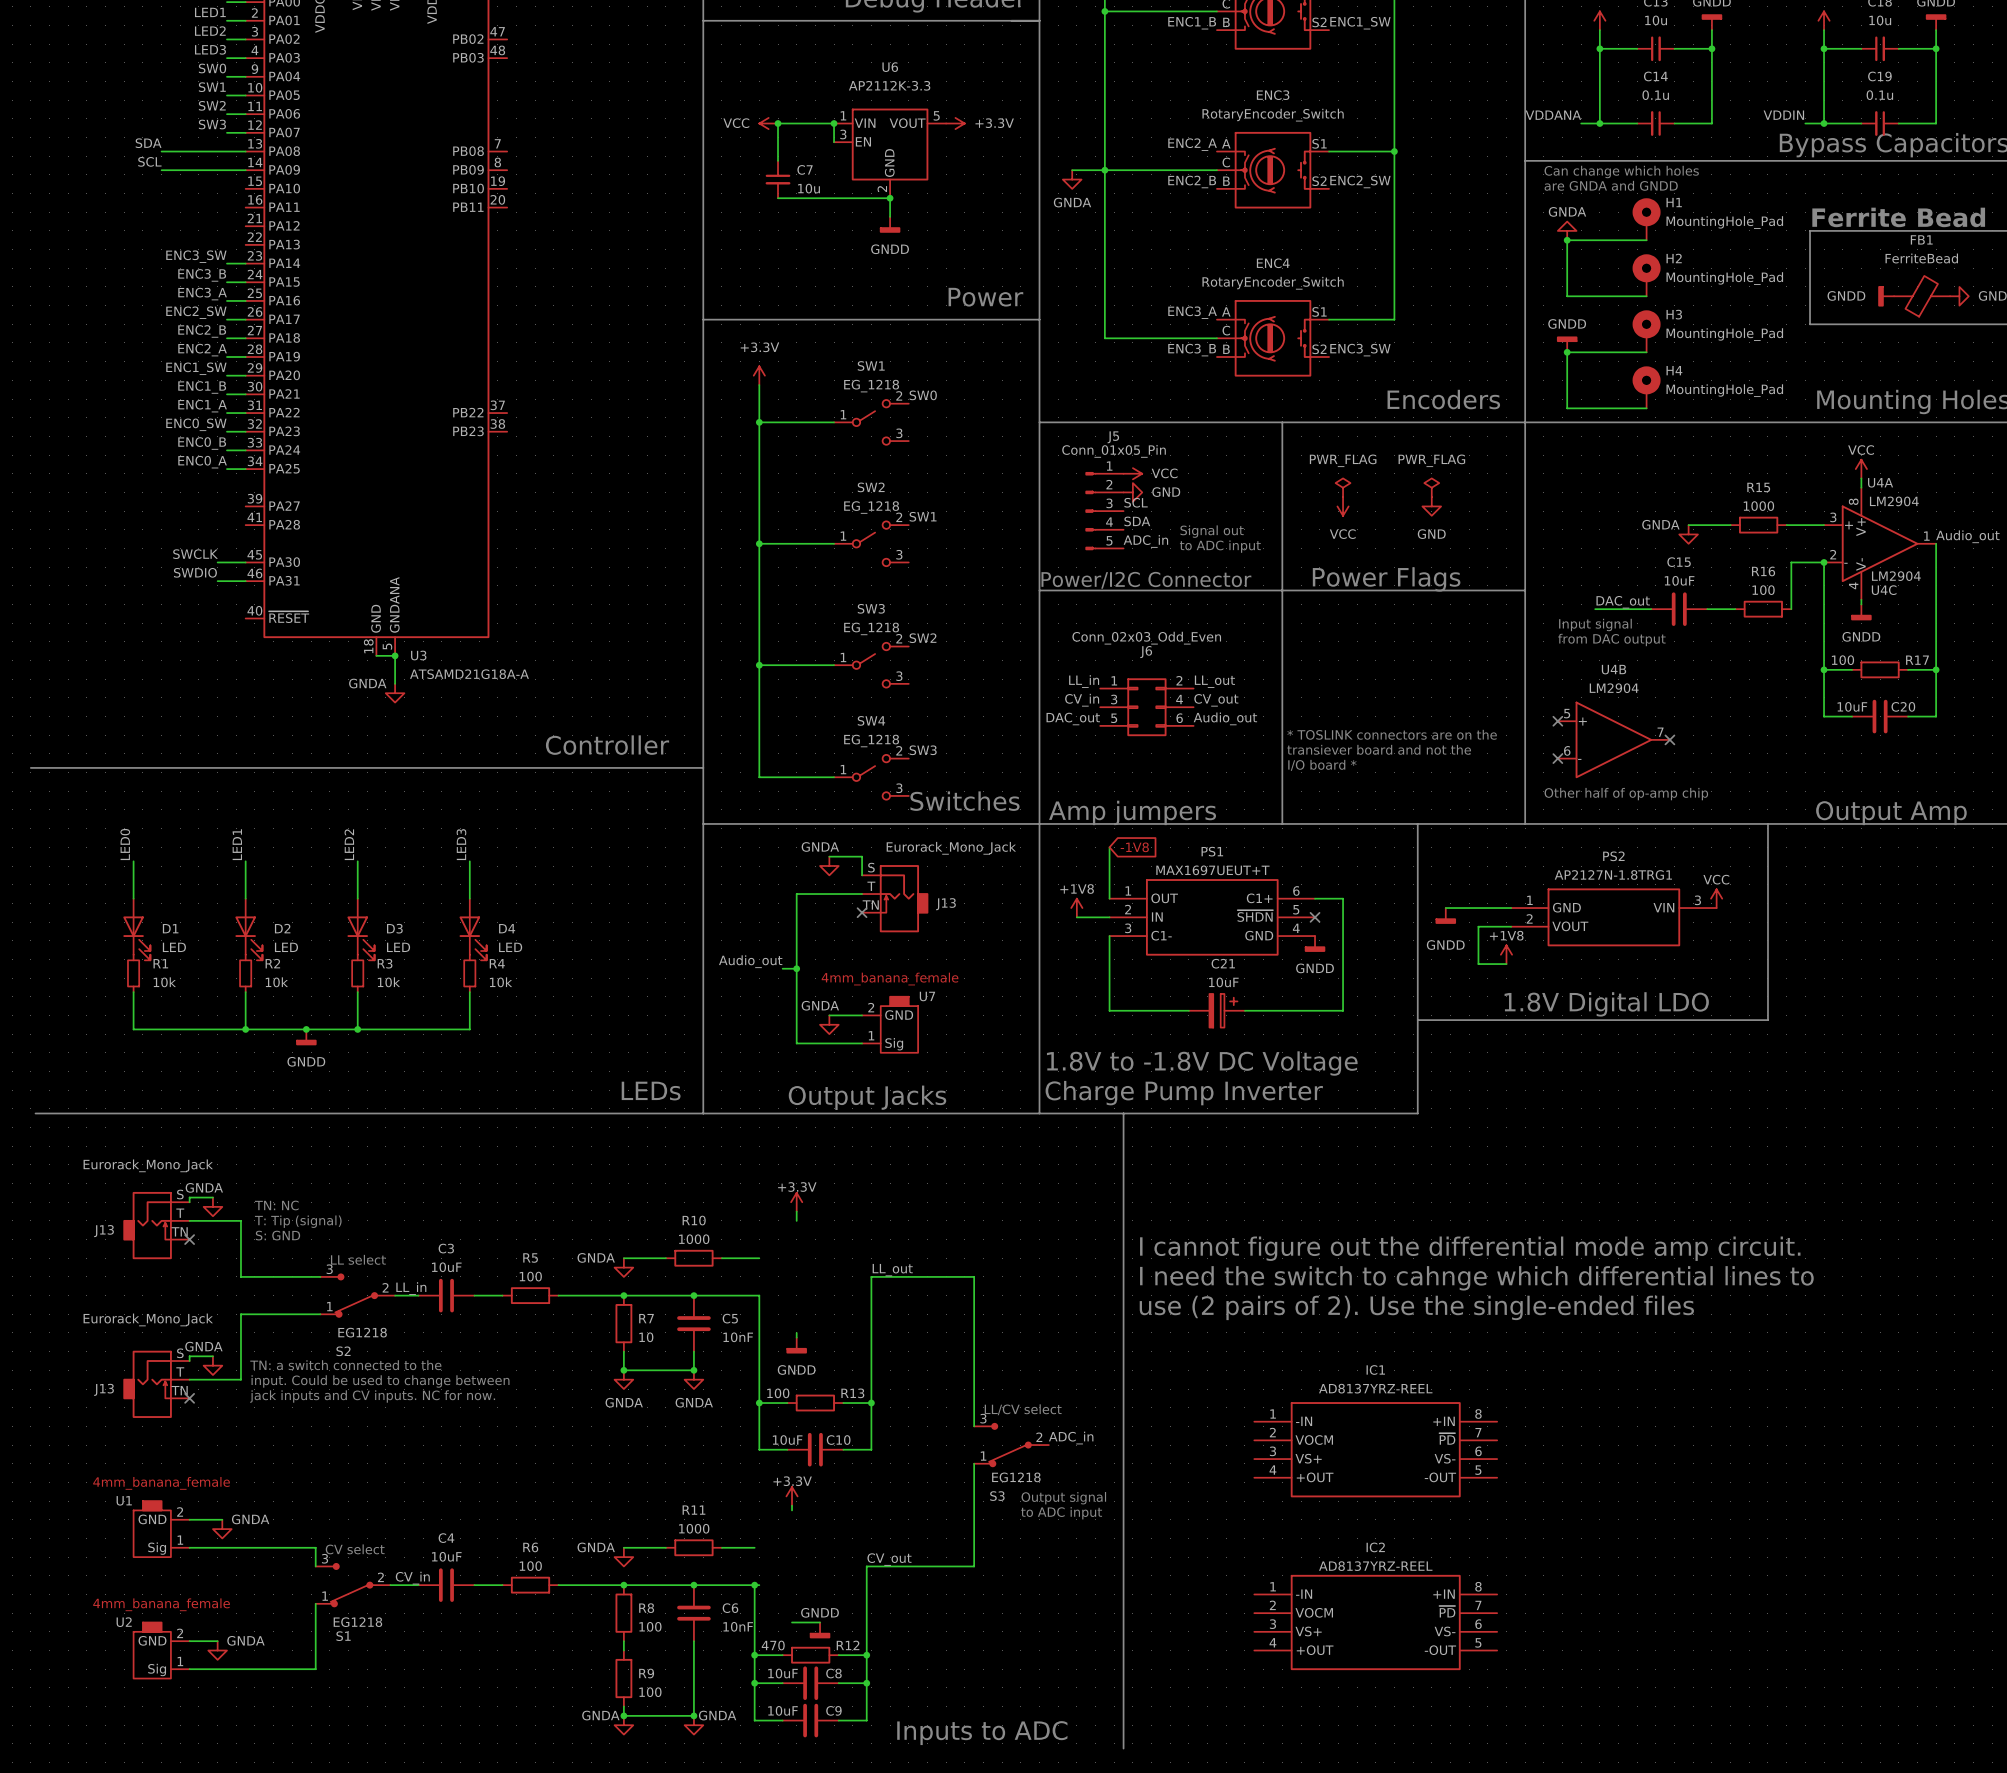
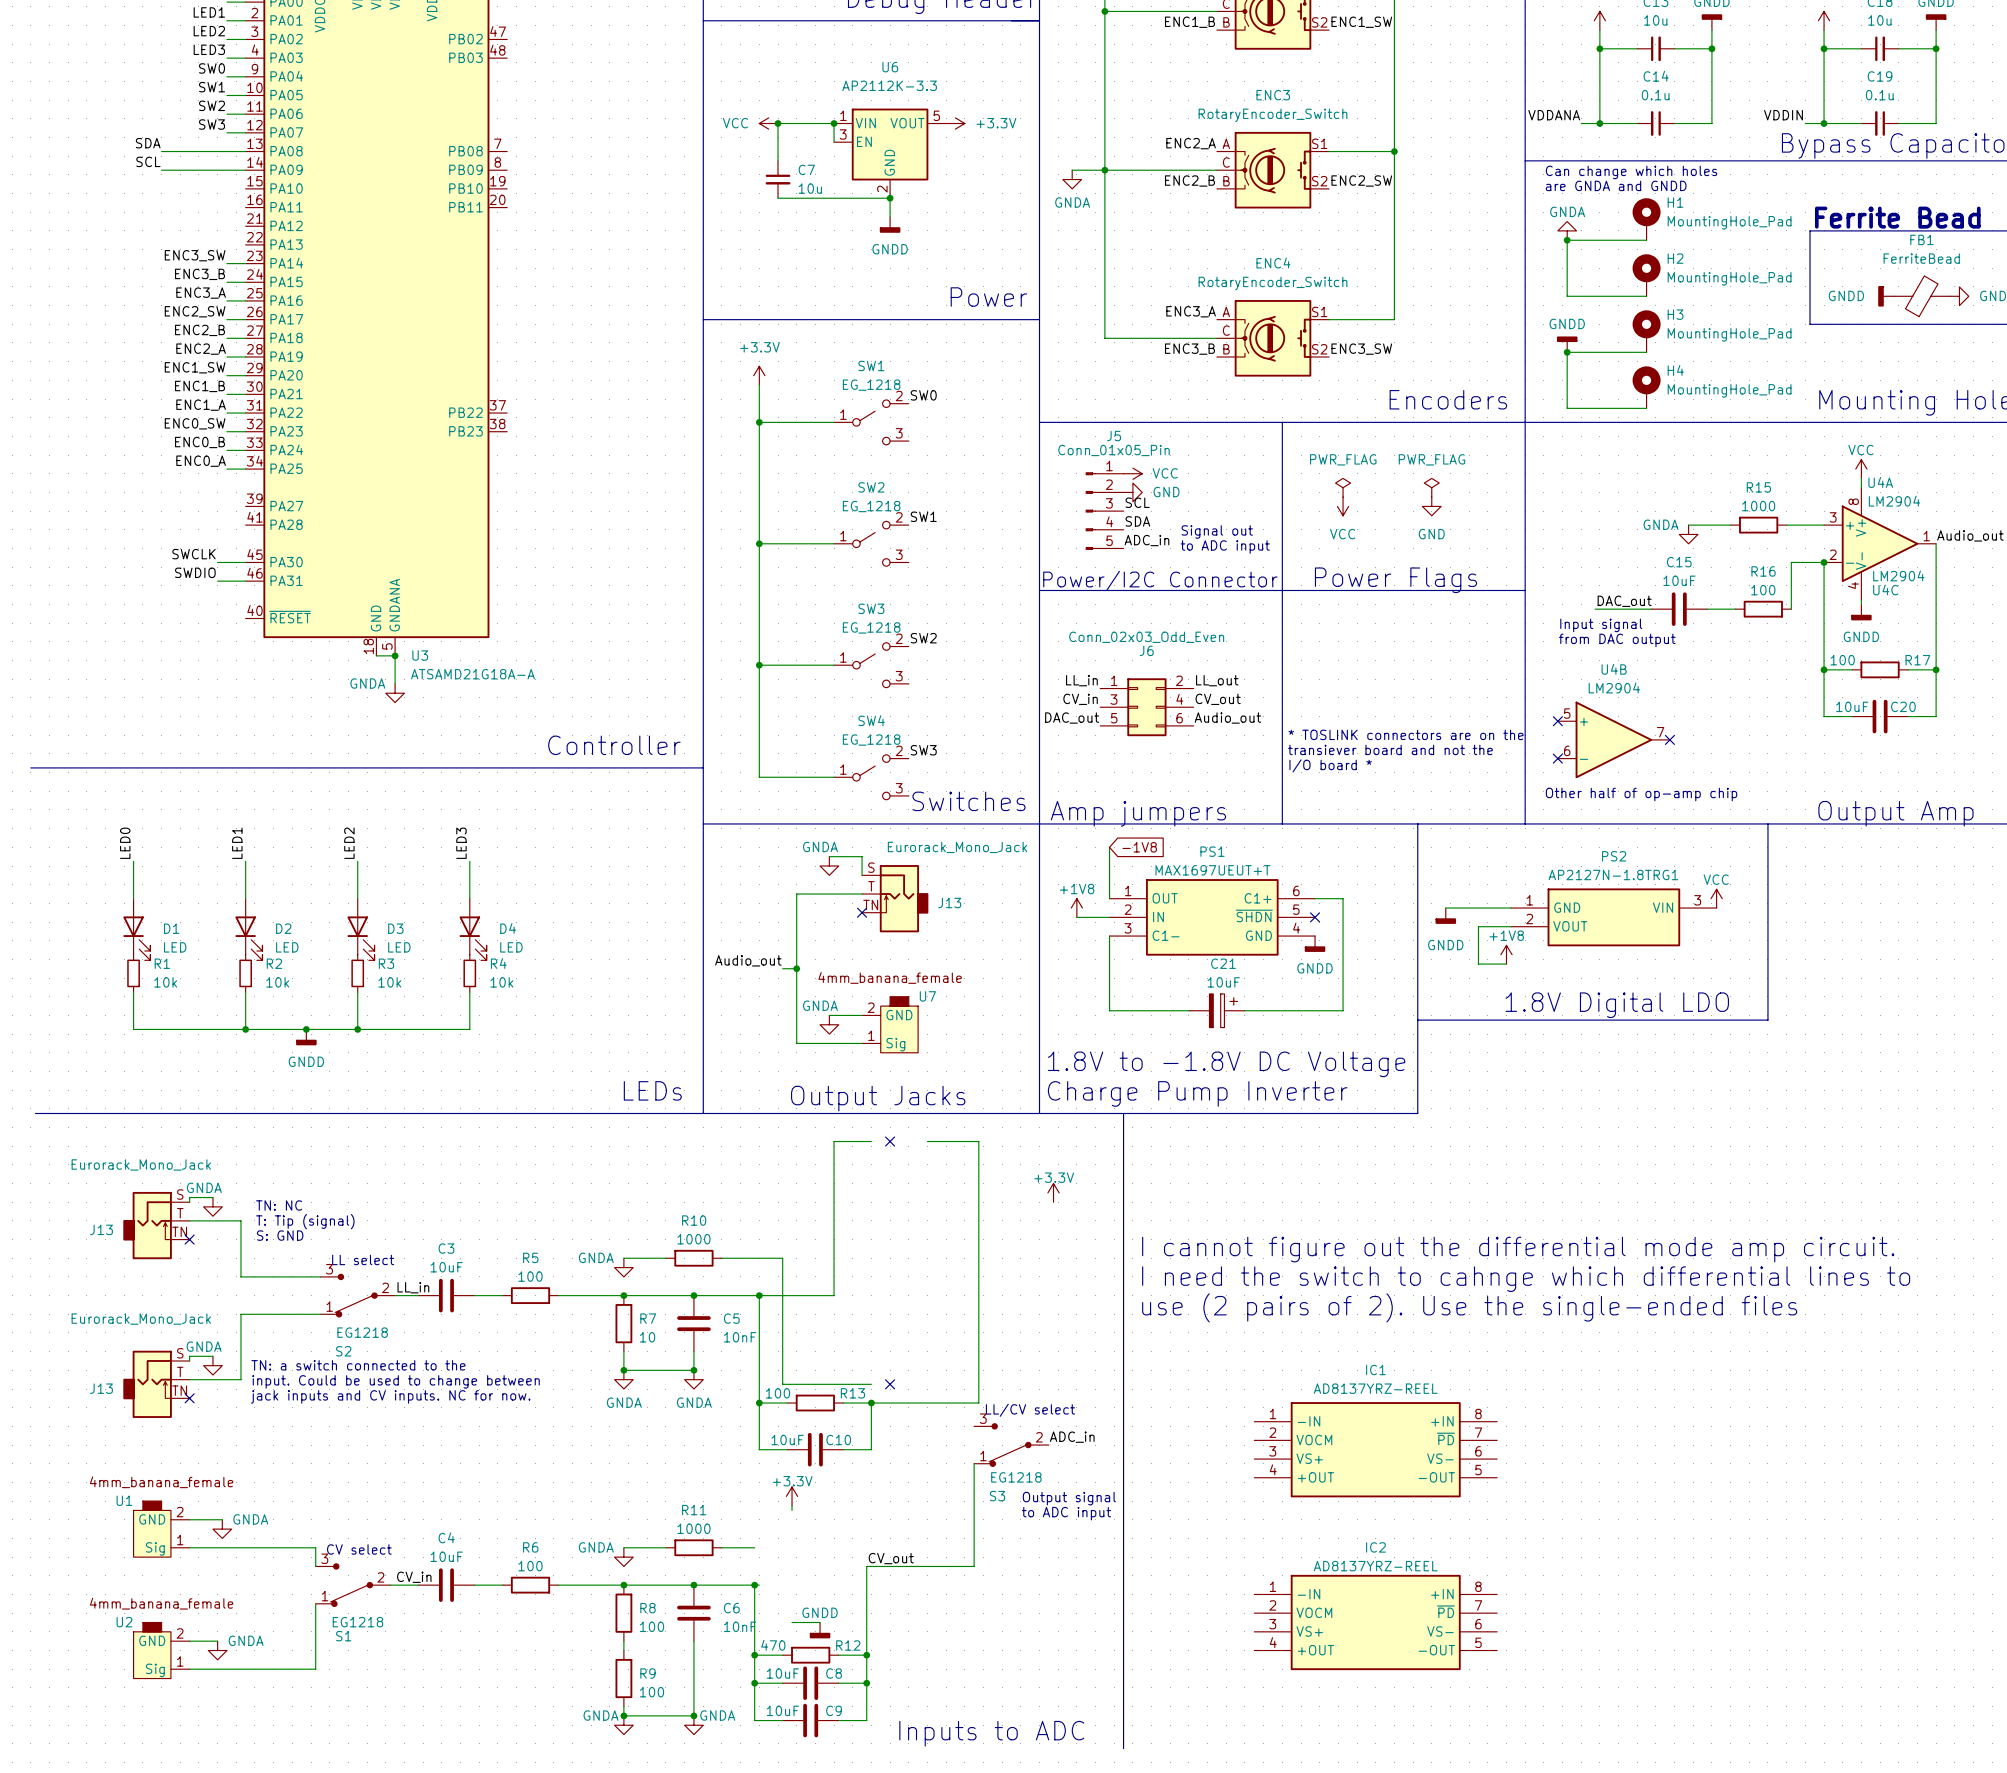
wire: none -> (871, 1141) (834, 1141) (834, 1295) (759, 1295)
no-connect mark: none -> (890, 1141)
power symbol: none -> +3.3V (1053, 1192)
power symbol: +3.3V (796, 1202) -> none
wire: (796, 1211) (796, 1220) -> none
wire: none -> (759, 1258) (782, 1258) (782, 1384) (871, 1384)
label: LL_out (892, 1270) -> none
junction: none -> (759, 1295)
wire: (796, 1332) (796, 1337) -> none
power symbol: GNDD (796, 1345) -> none
no-connect mark: none -> (890, 1384)
wire: (871, 1403) (871, 1276) (974, 1276) (974, 1426) -> (871, 1403) (978, 1403) (978, 1141) (927, 1141)

